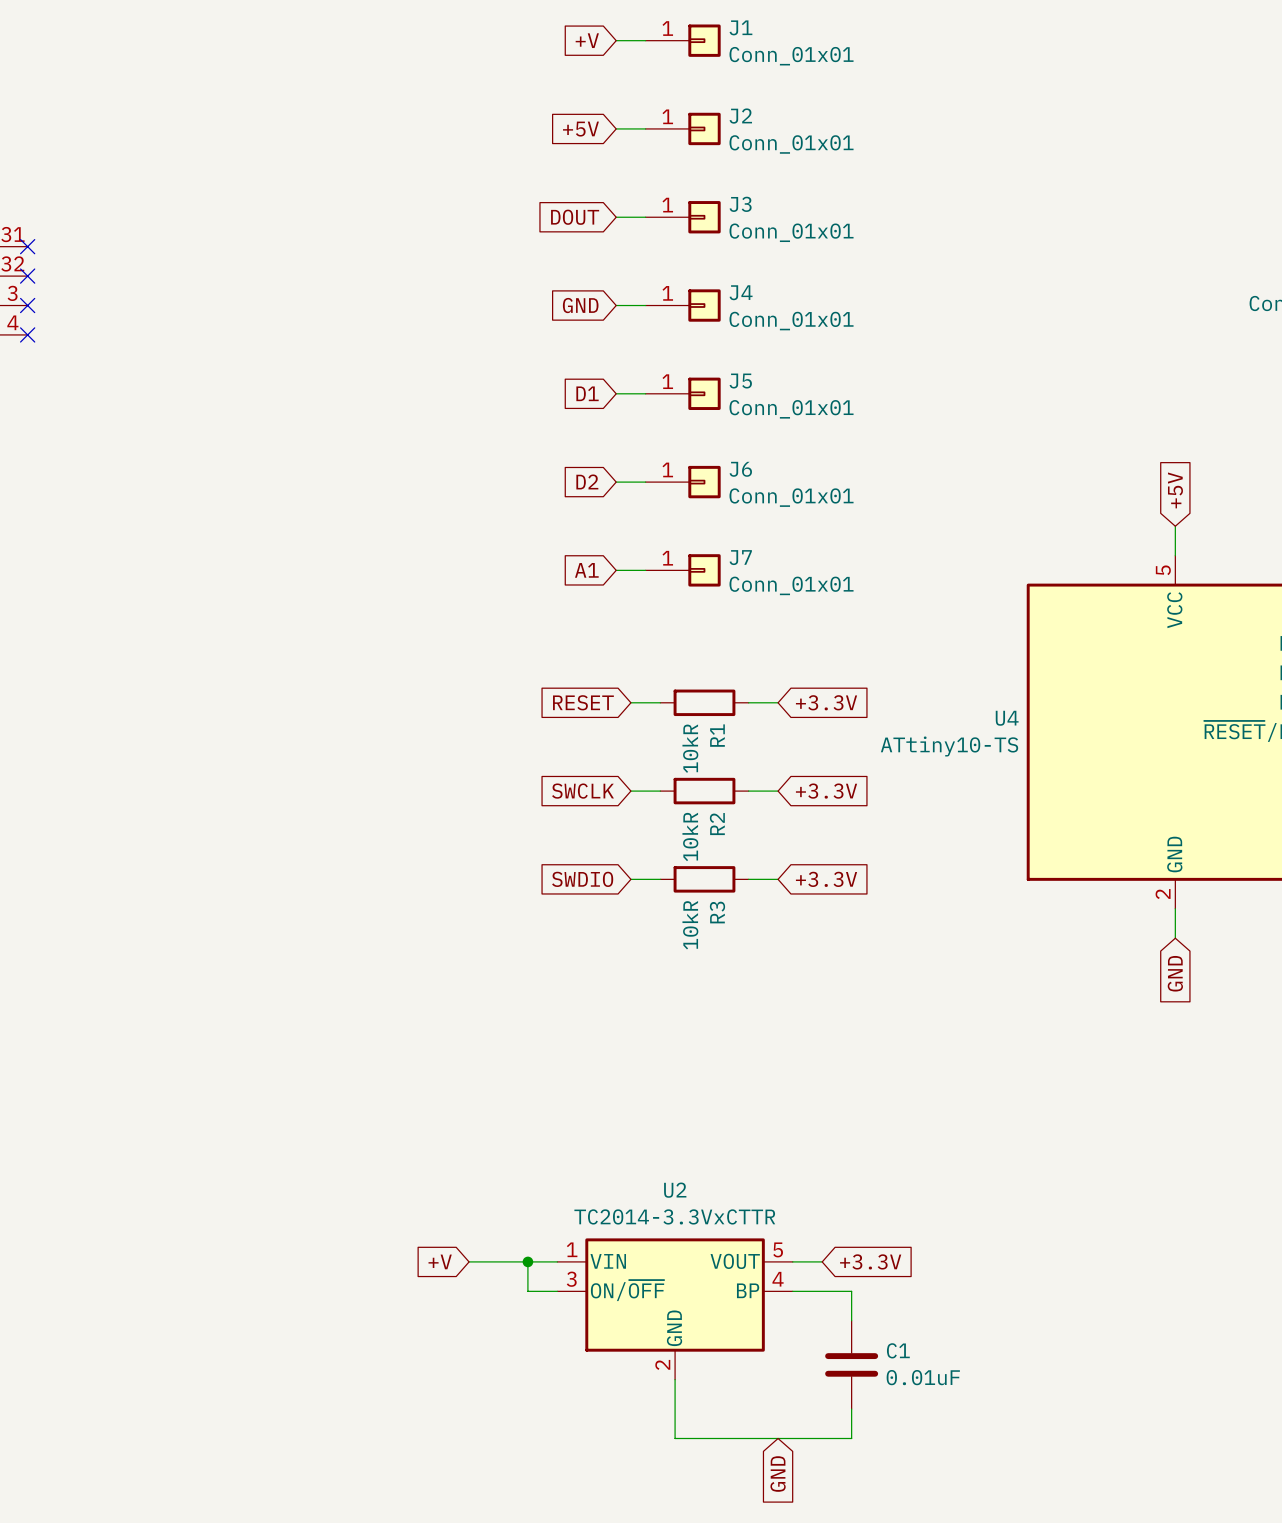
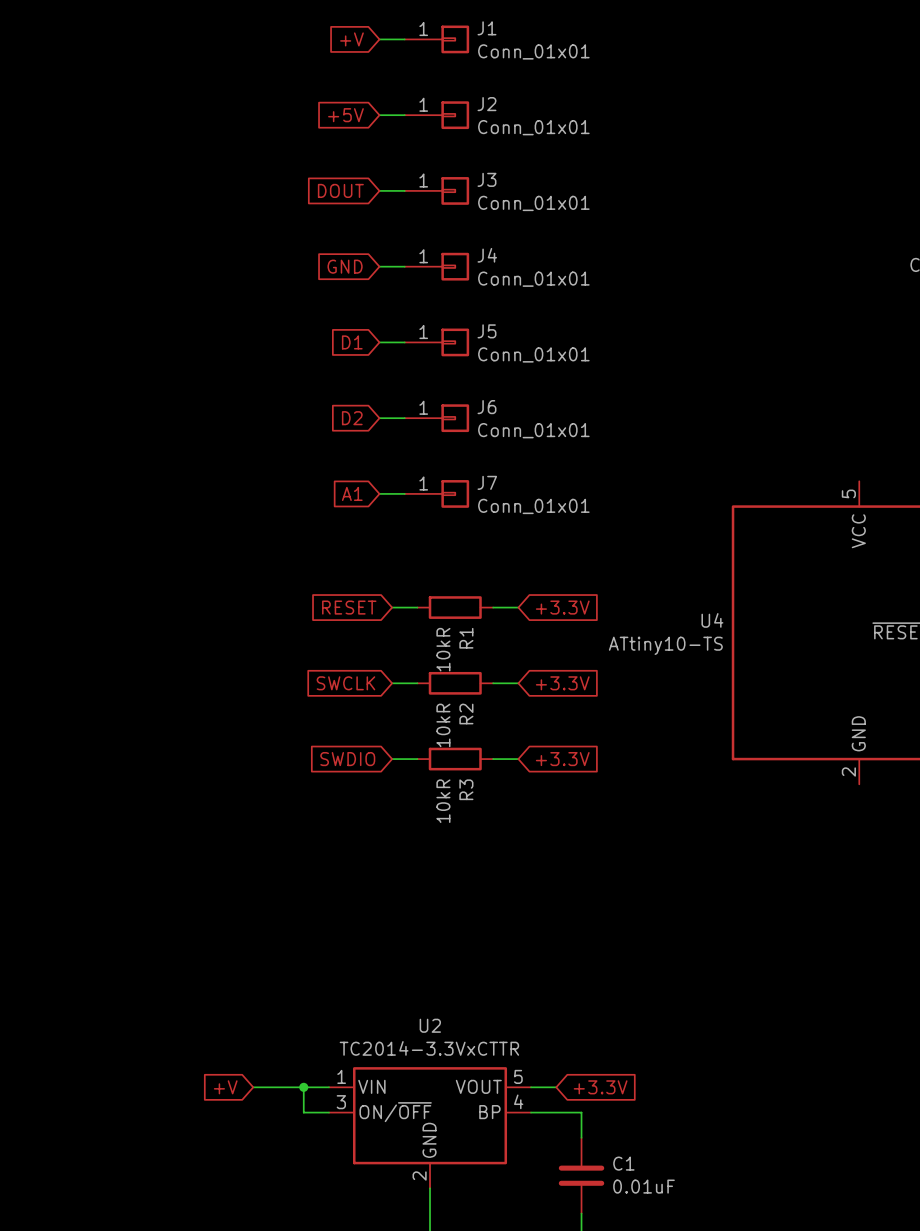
global label: +5V (1175, 490) -> none
wire: (1175, 526) (1175, 555) -> none
wire: (1175, 908) (1175, 938) -> none
global label: GND (1175, 973) -> none

